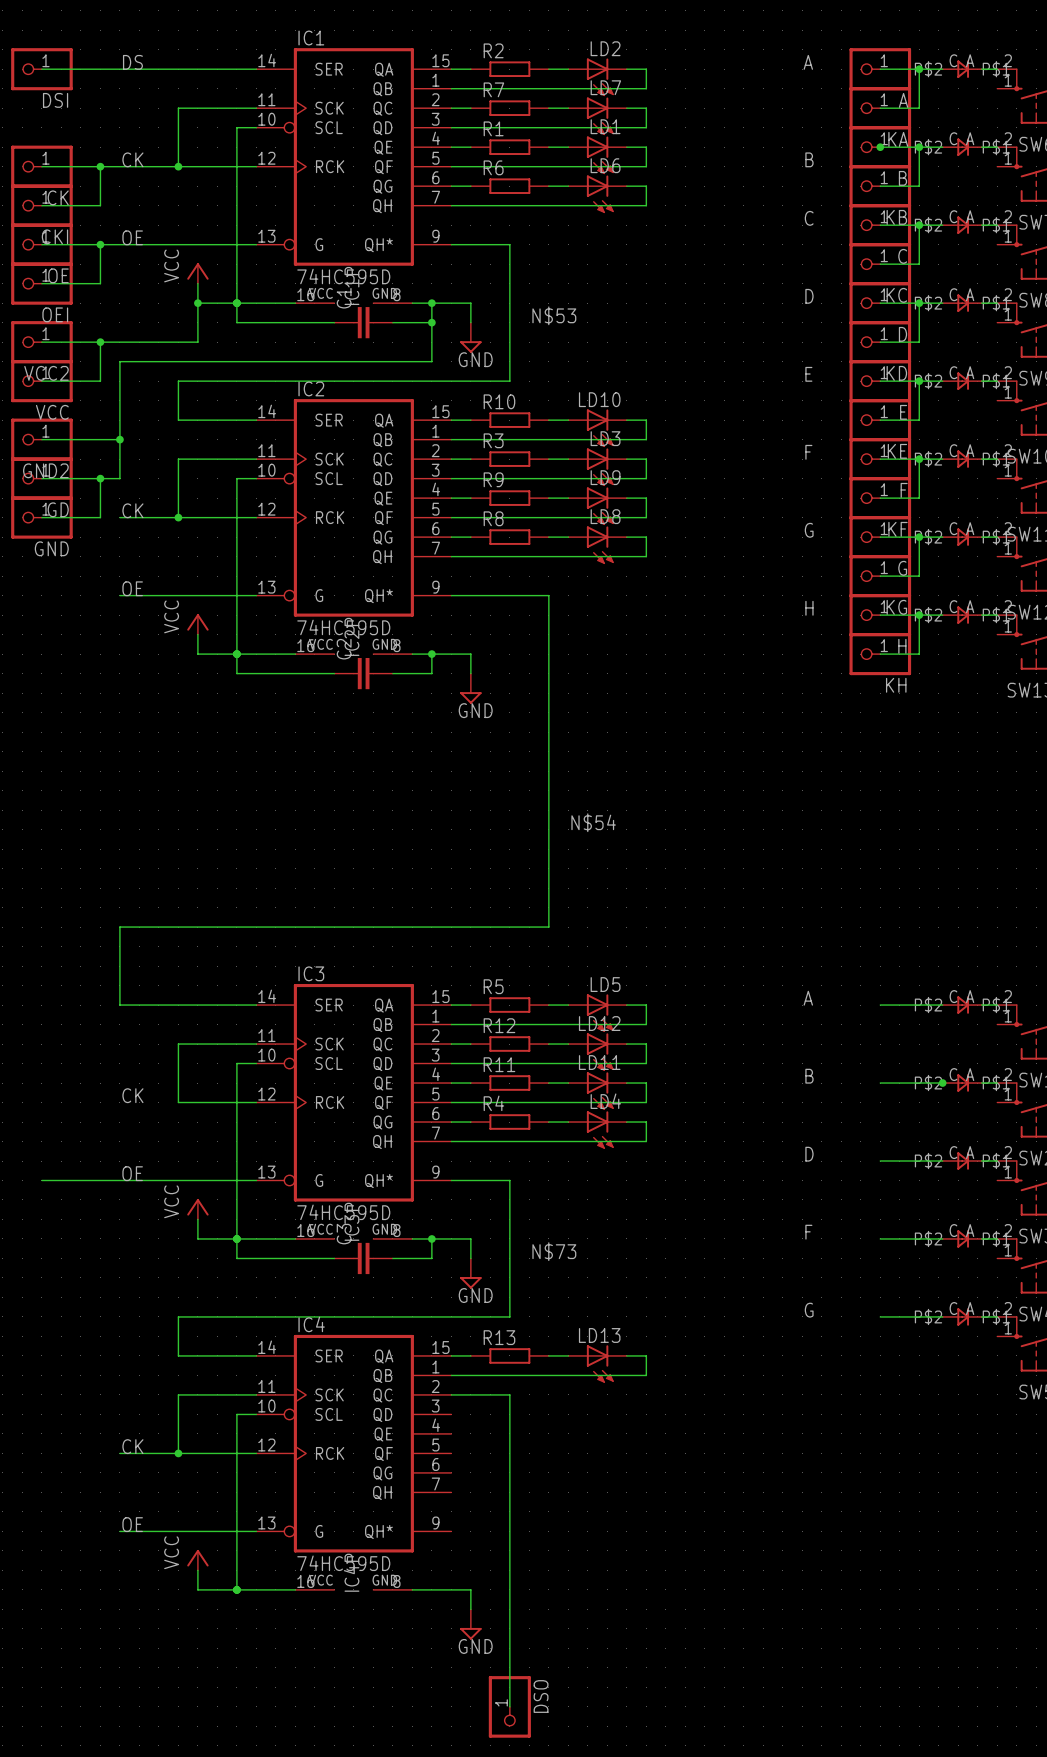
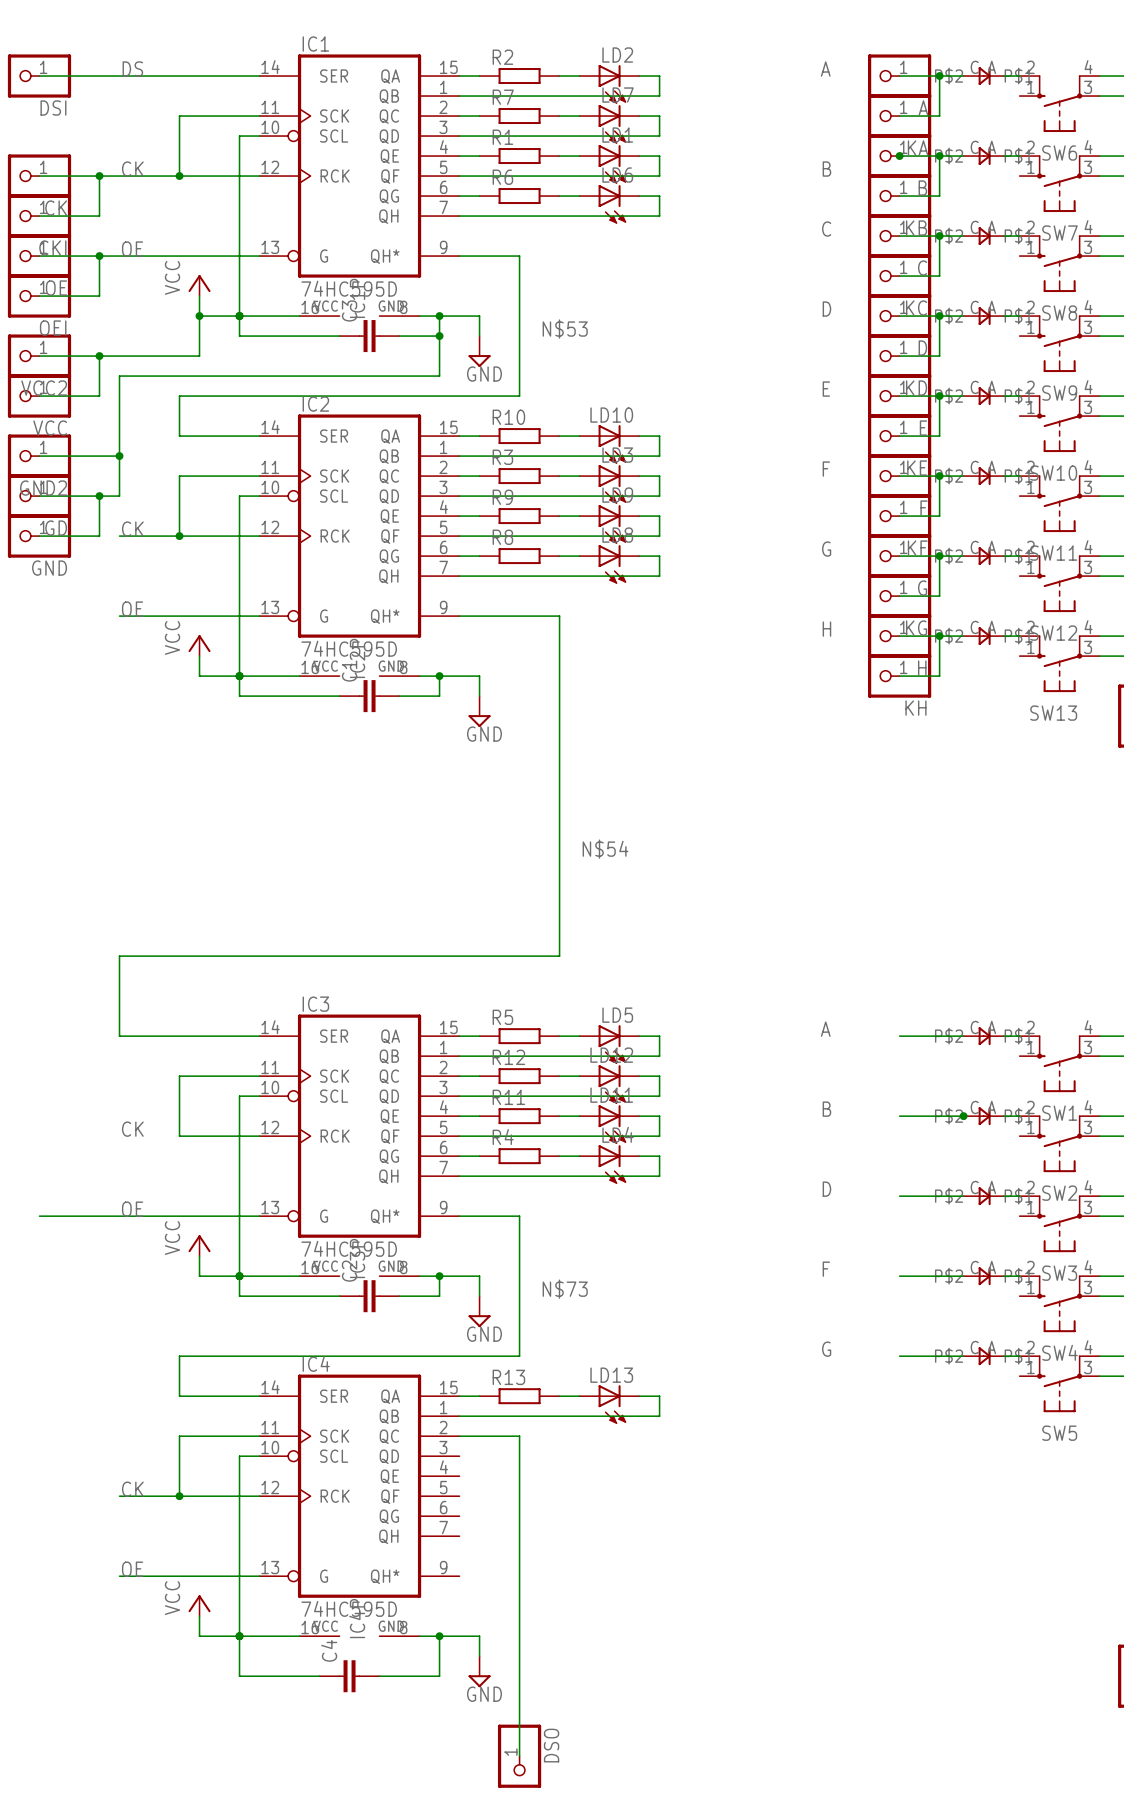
C1 name: C1 (344, 298) -> C3 (349, 311)
C2 name: C2 (344, 649) -> C1 (349, 671)
C3 name: C3 (344, 1234) -> C2 (349, 1271)
wire: none -> (239, 1636) (239, 1676) (319, 1676)
wire: none -> (439, 1636) (439, 1676) (379, 1676)
junction: none -> (439, 1636)
C4: none -> (349, 1676)

